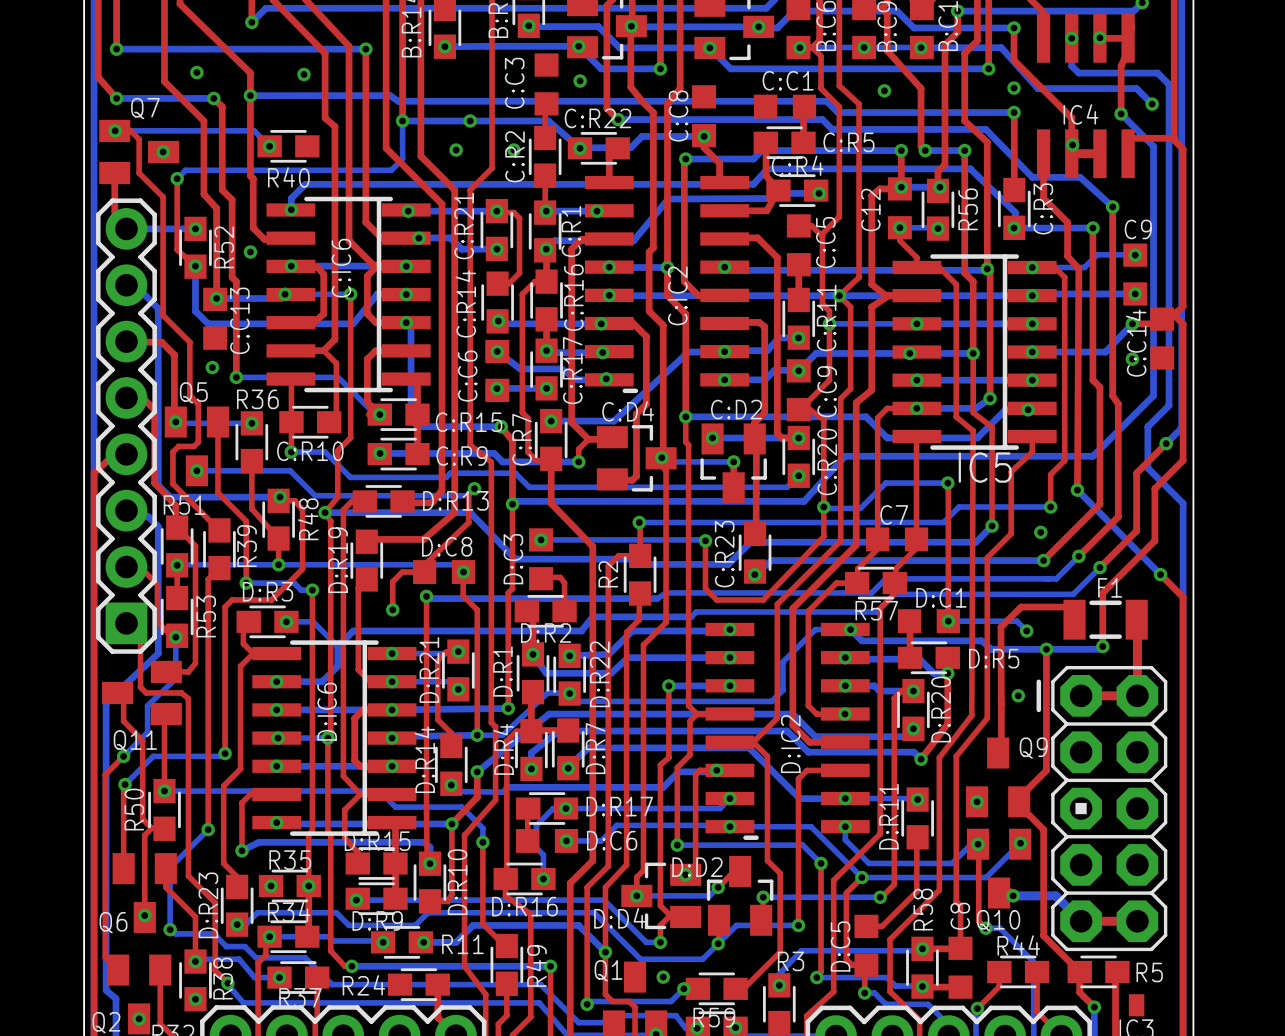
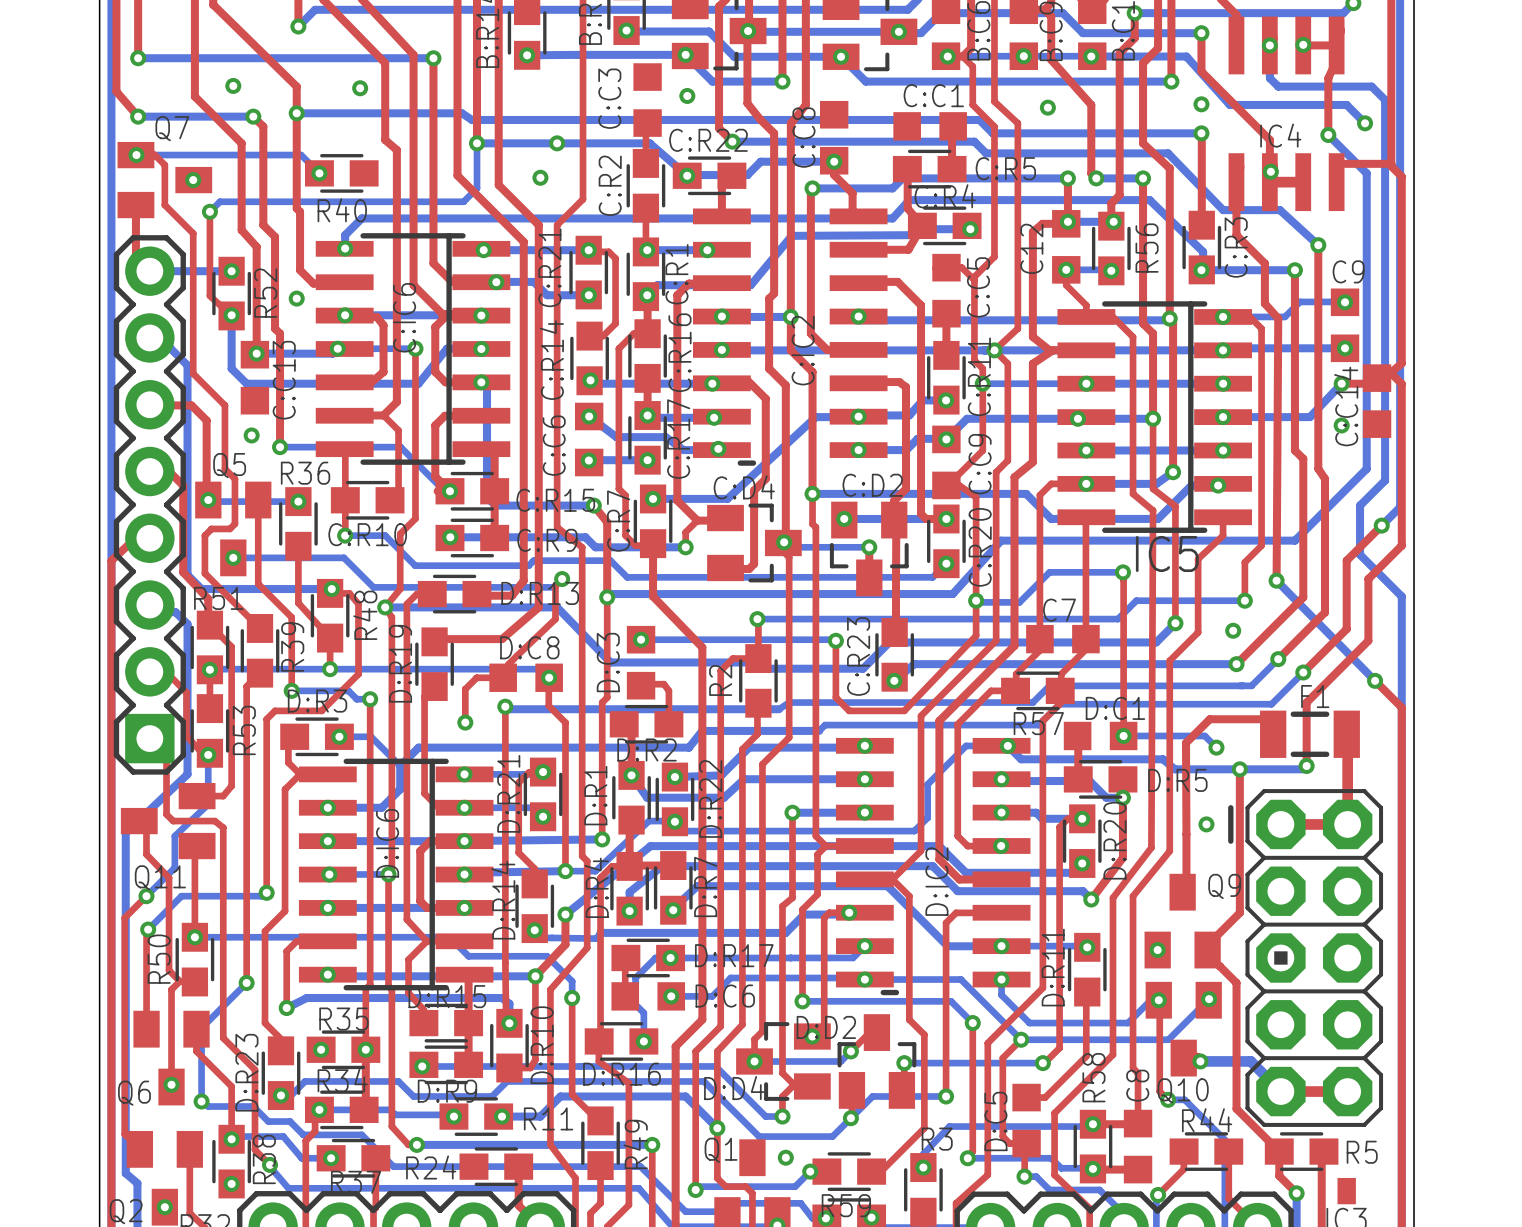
via: (513, 150) -> none

